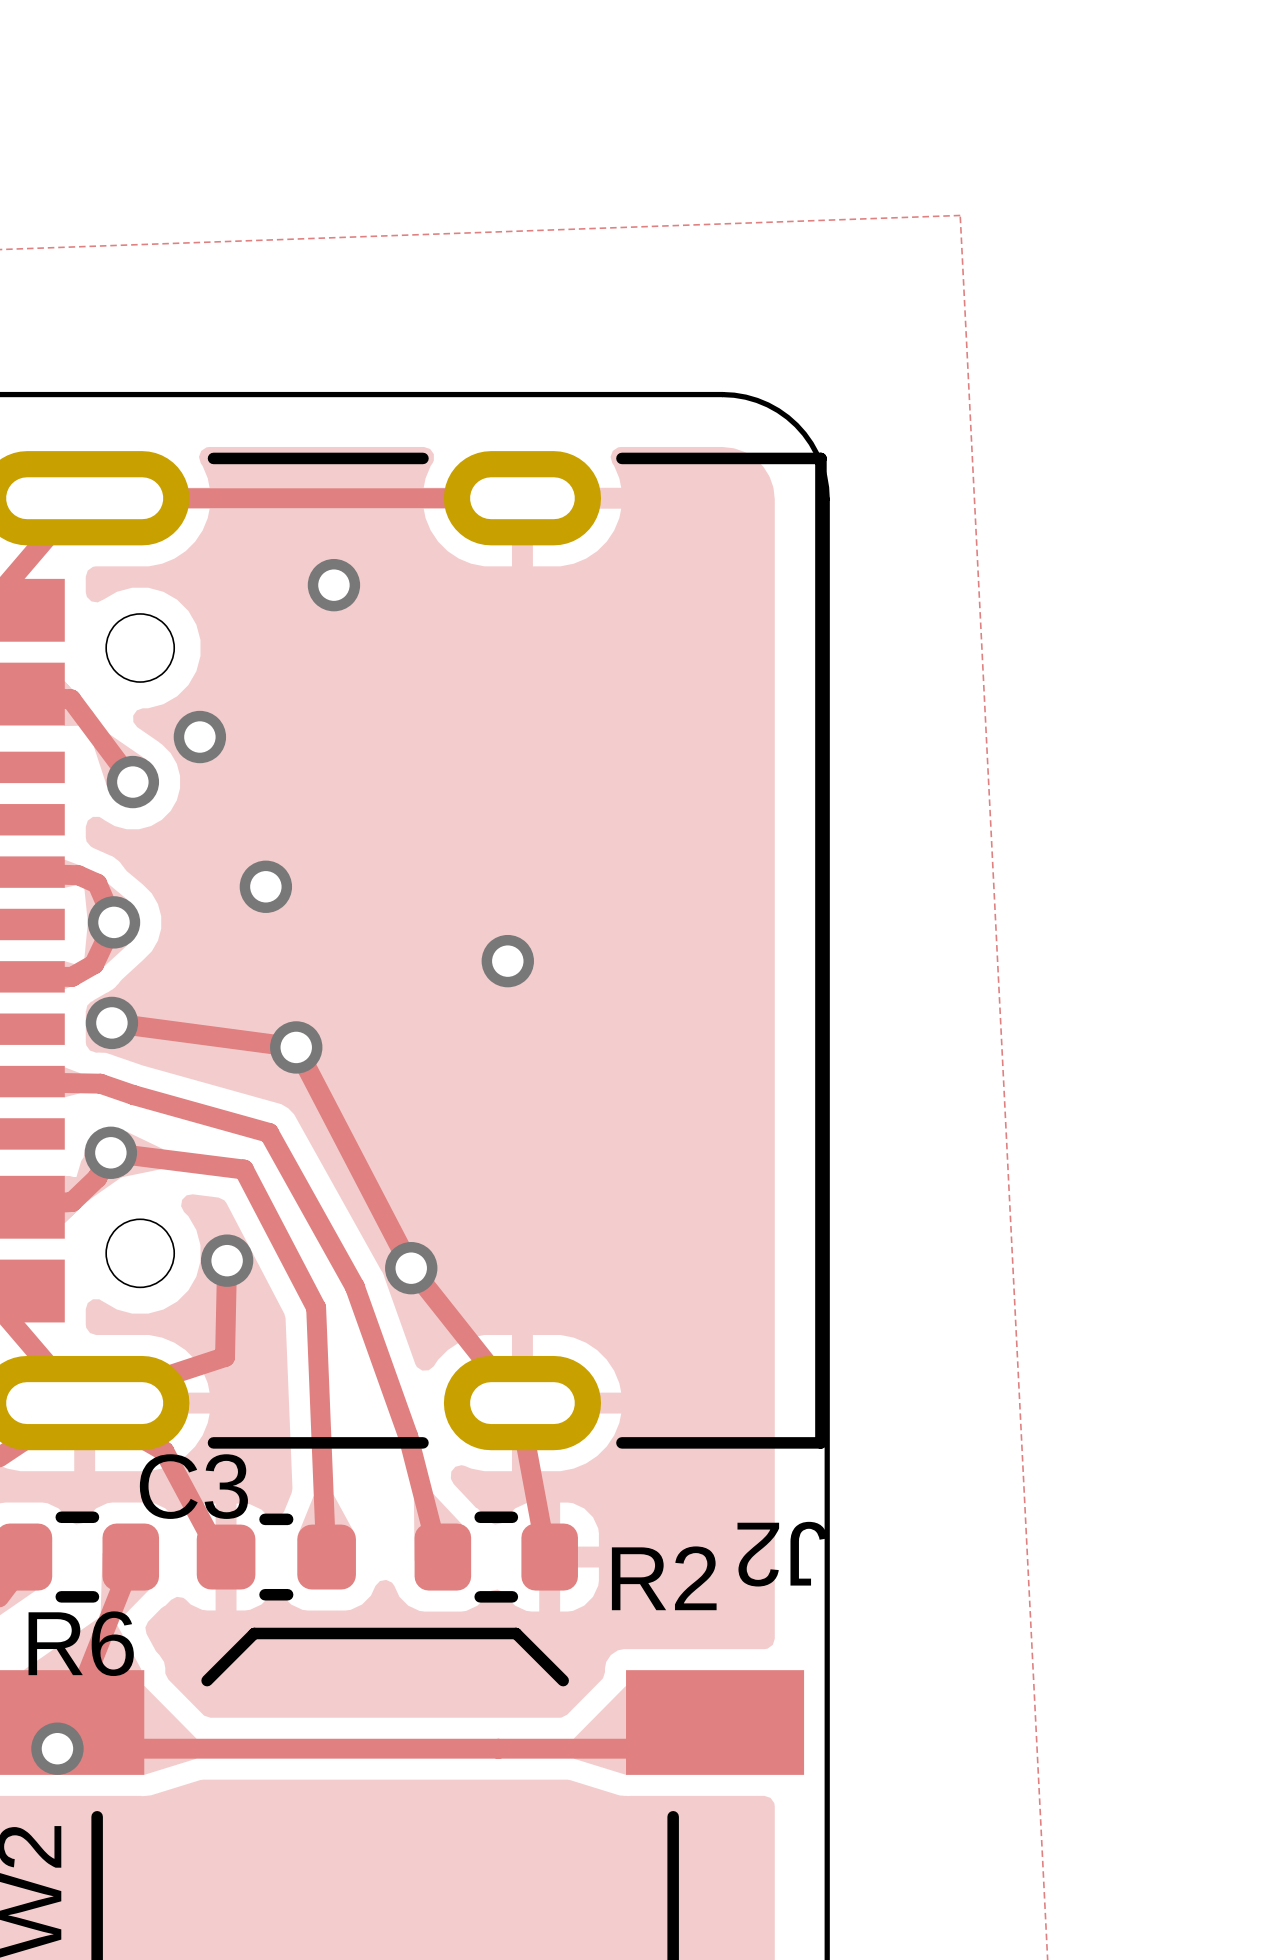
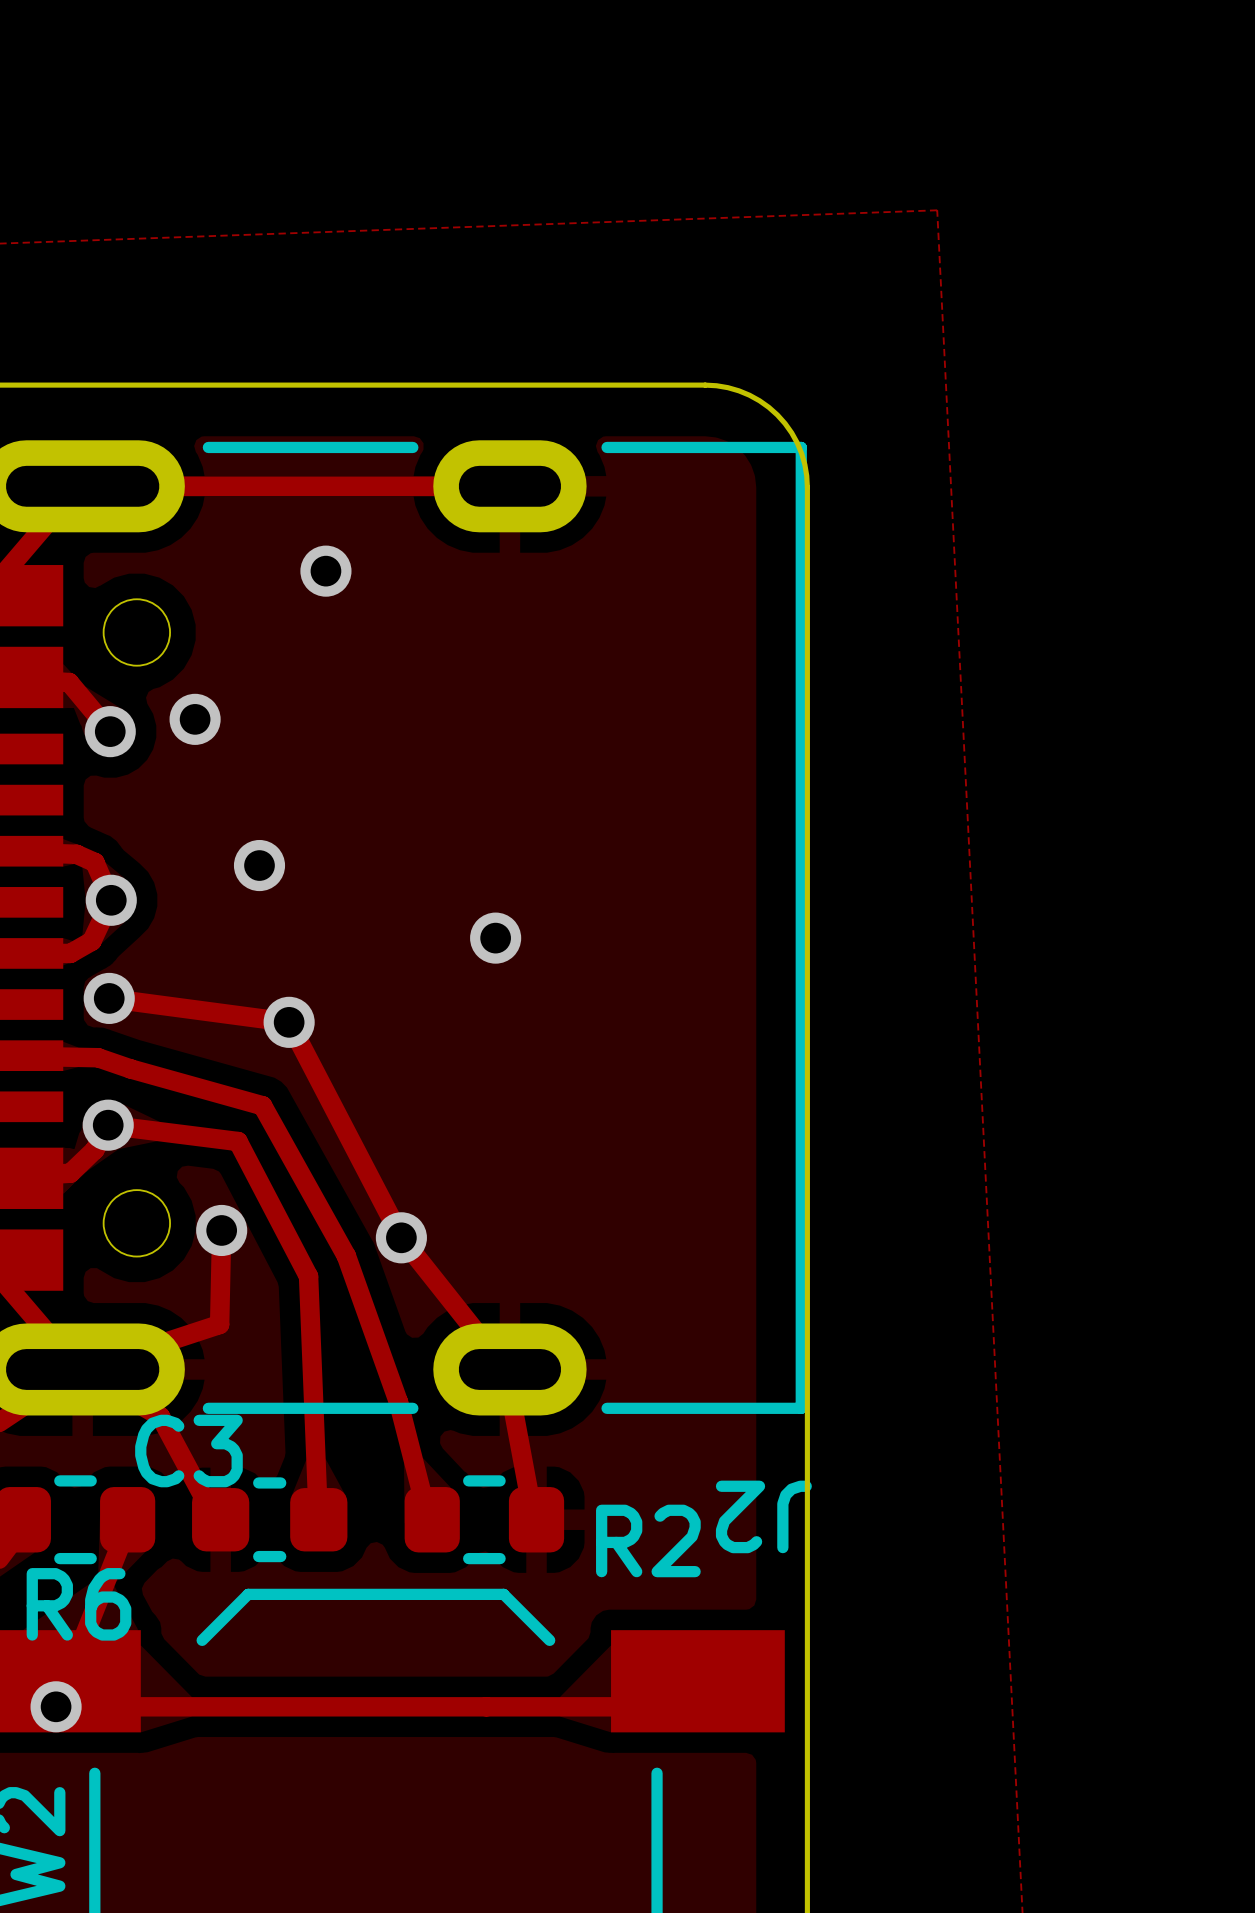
track: (71, 699) (132, 782) -> (69, 682) (110, 731)
via position: (132, 782) -> (110, 731)

